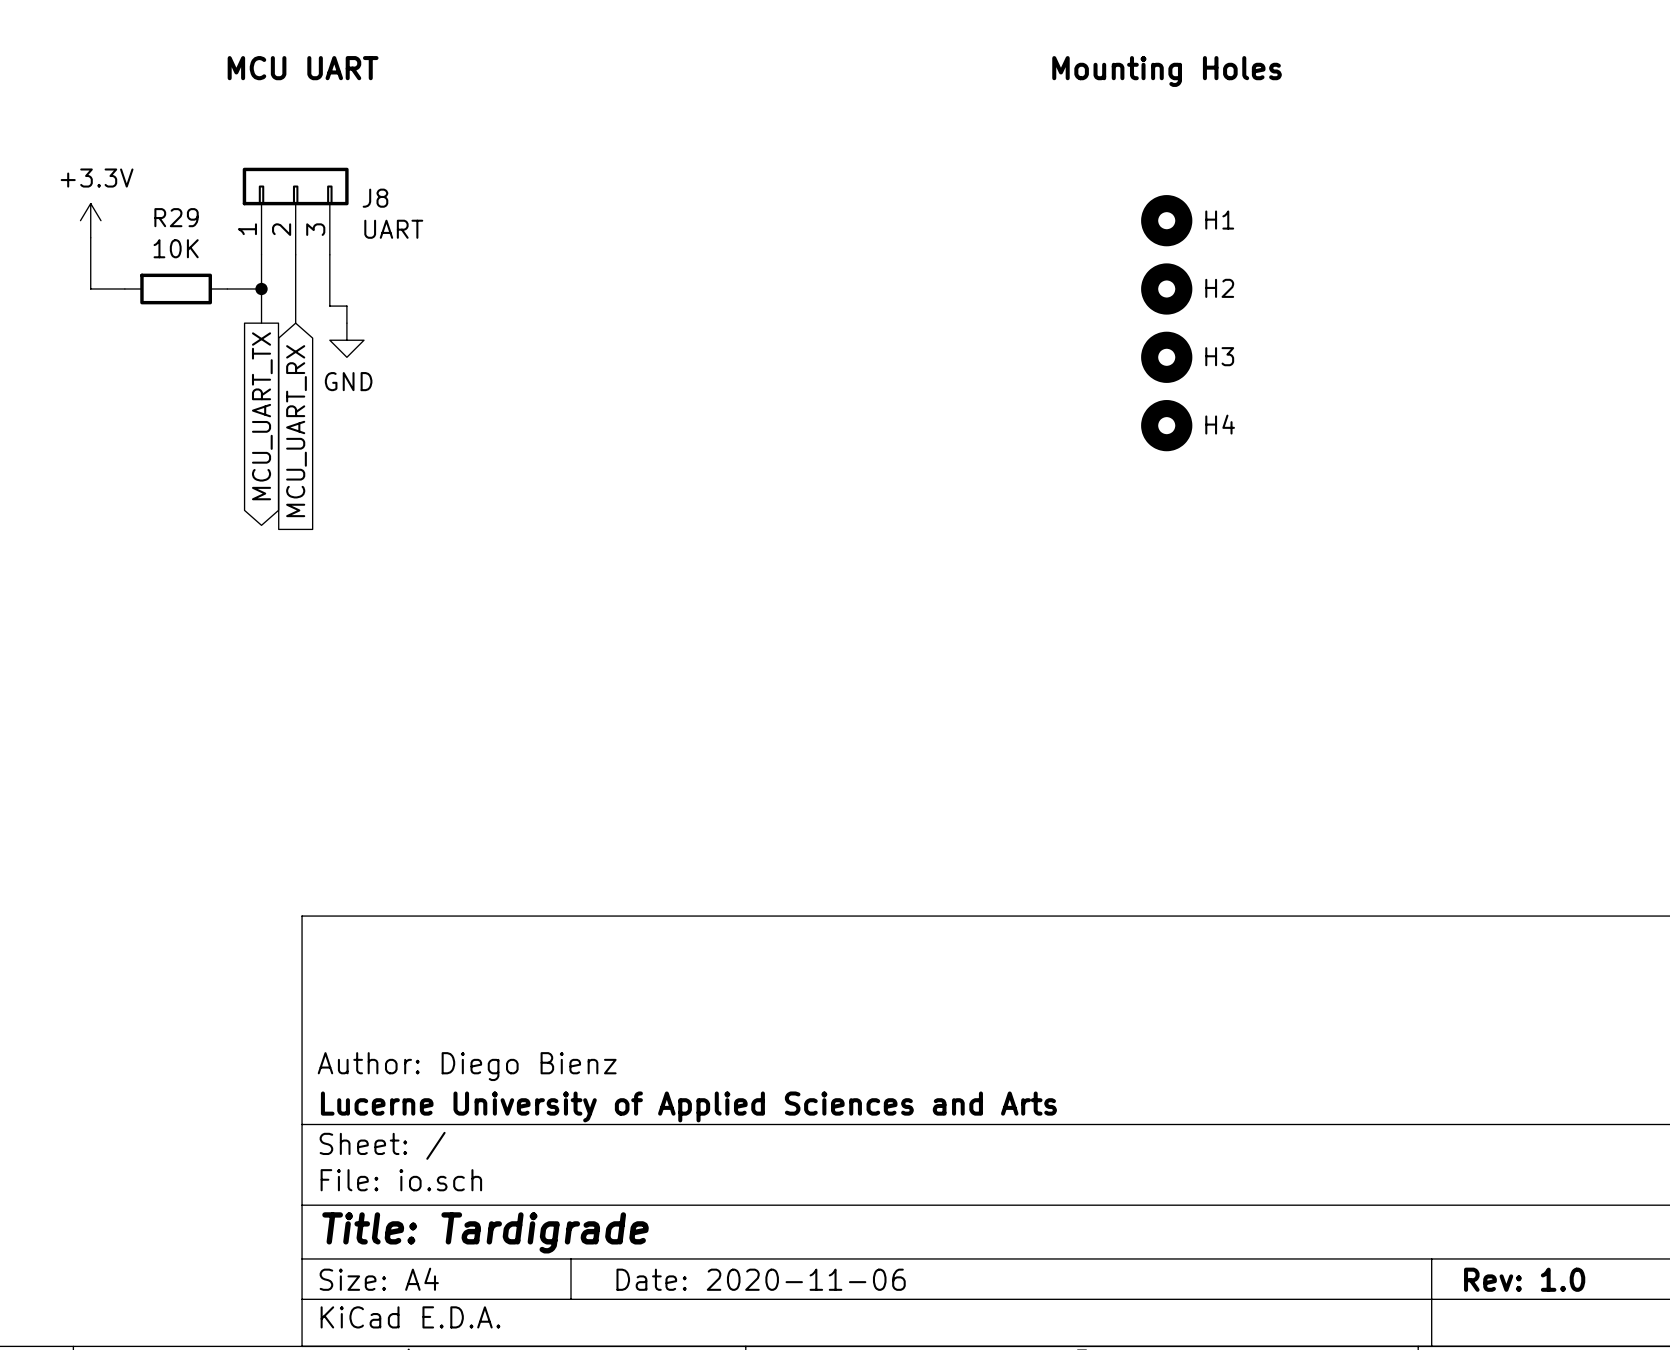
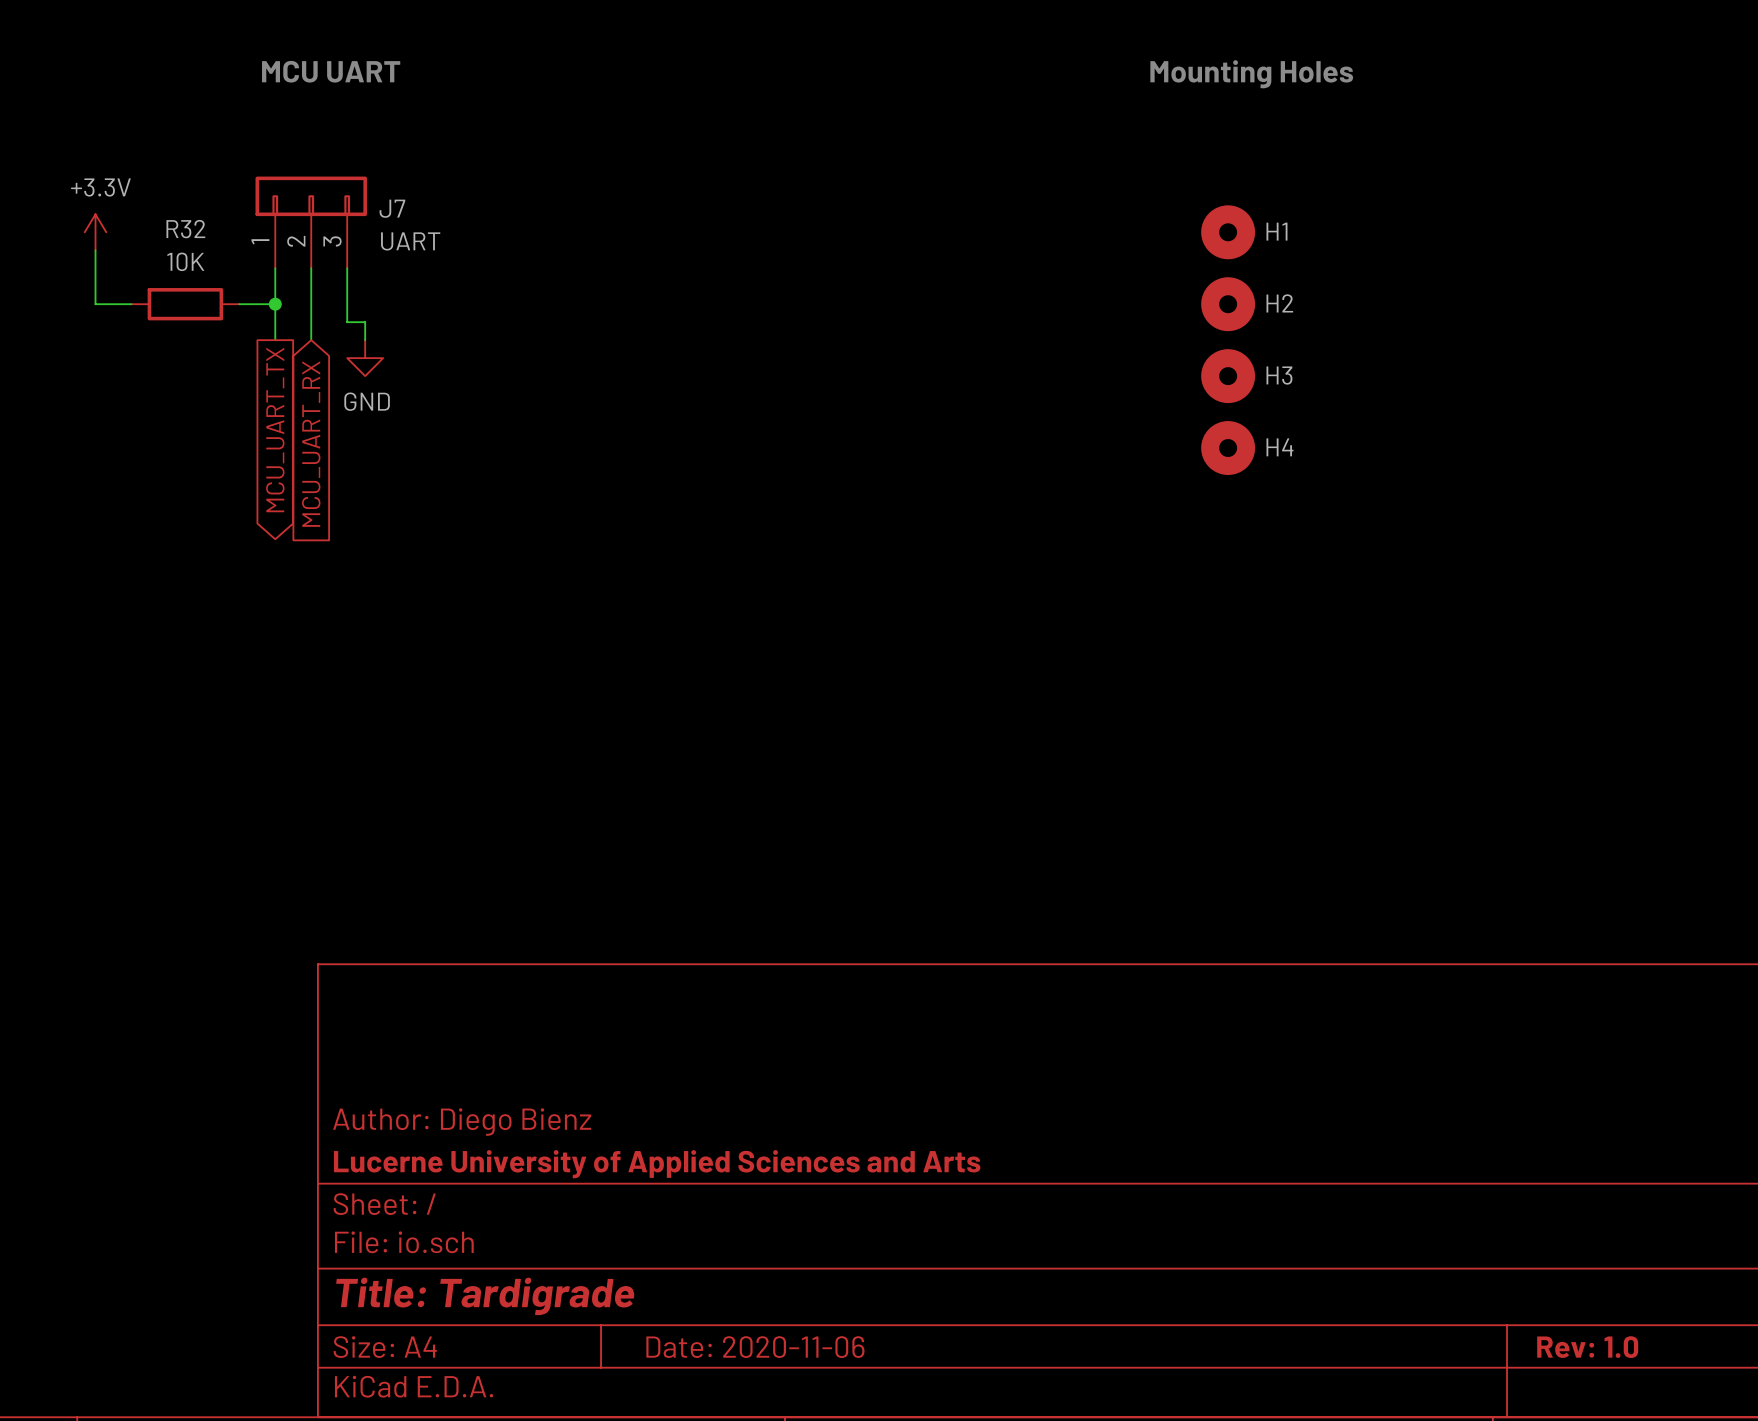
J8 name: J8 (375, 198) -> J7 (392, 208)
R29 name: R29 (176, 217) -> R32 (185, 229)

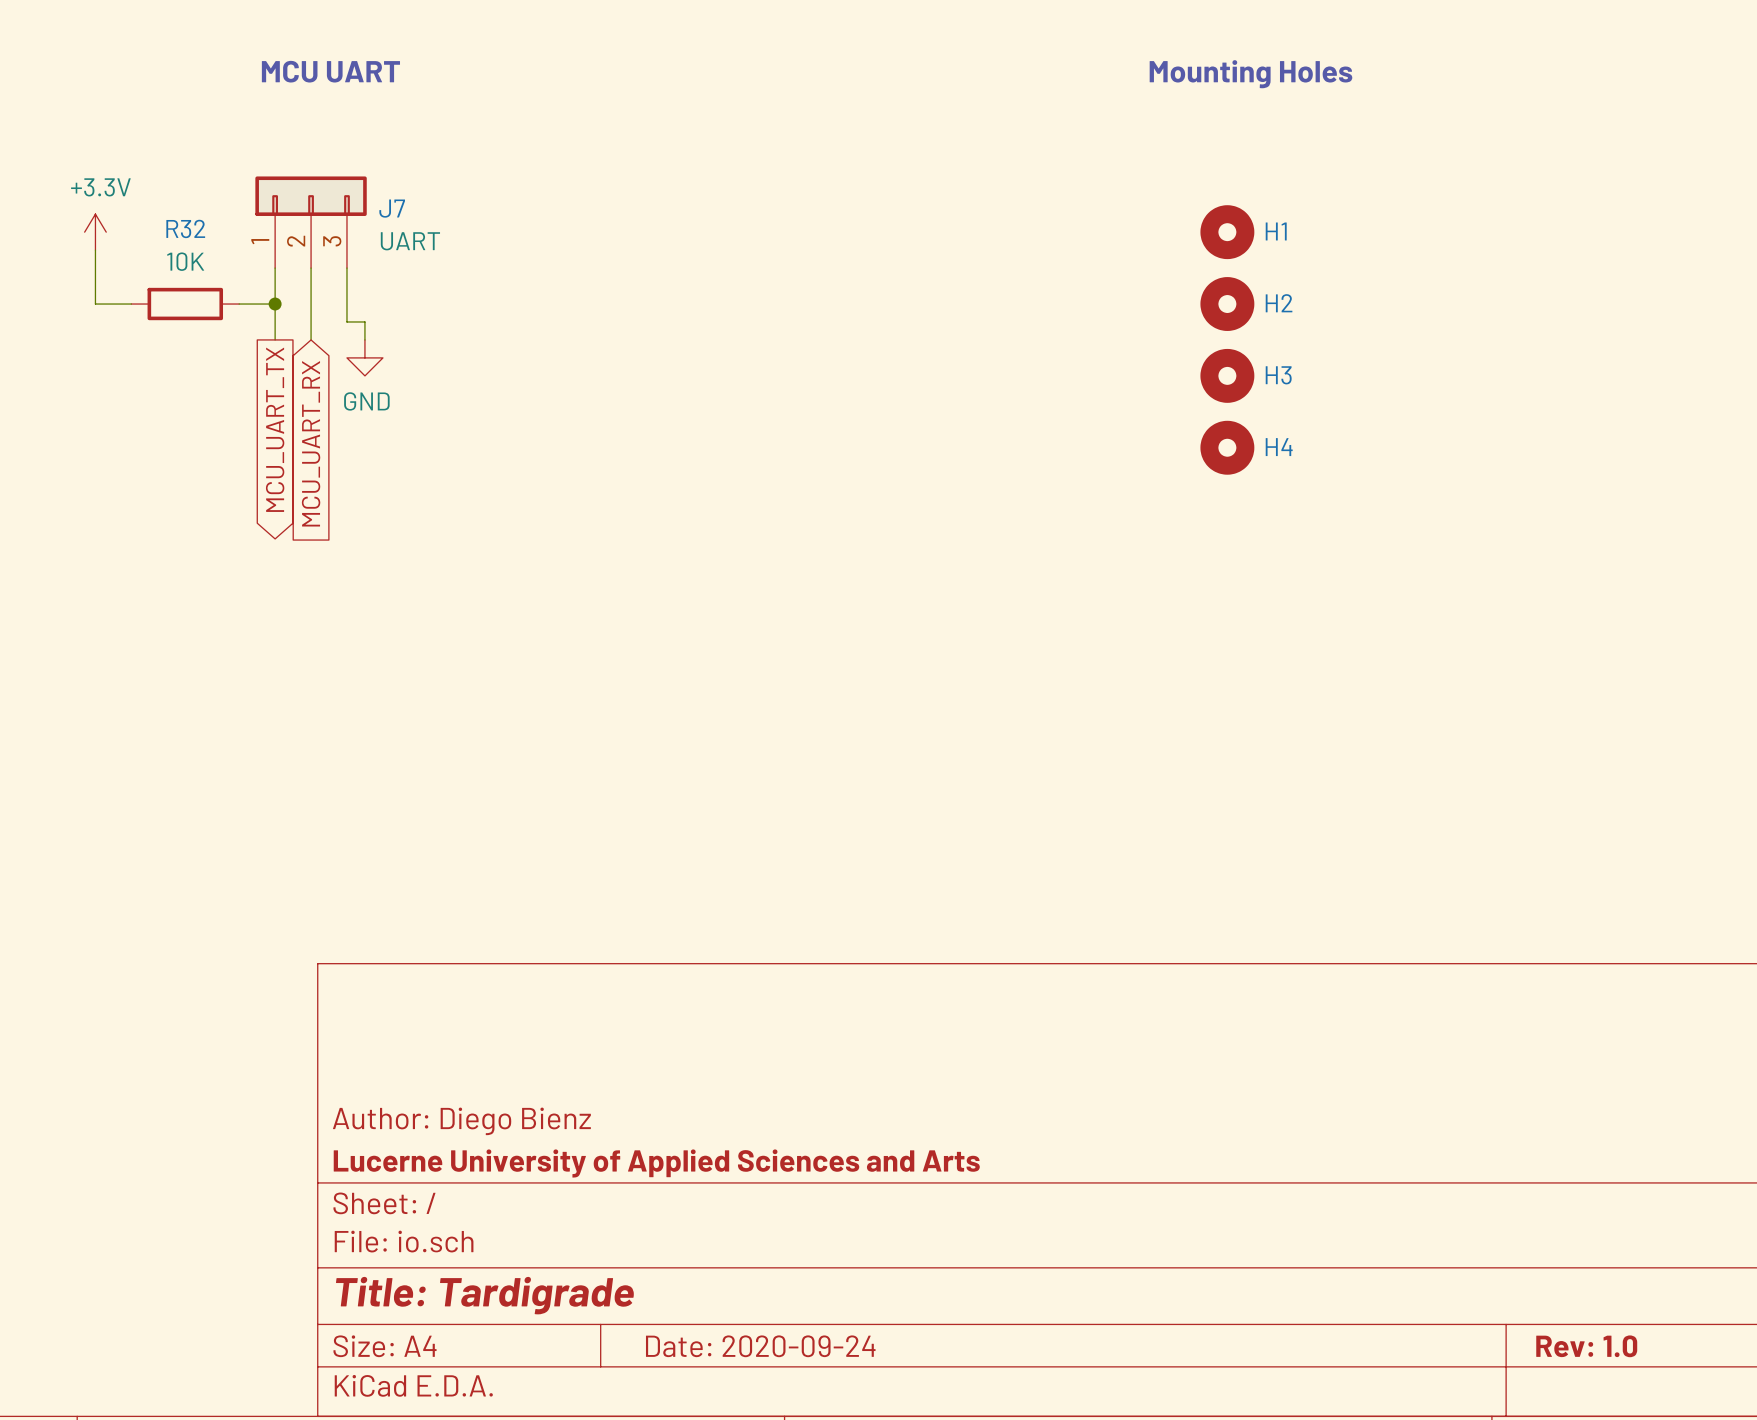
title block: Date: 2020-11-06 (755, 1347) -> Date: 2020-09-24 (760, 1346)

